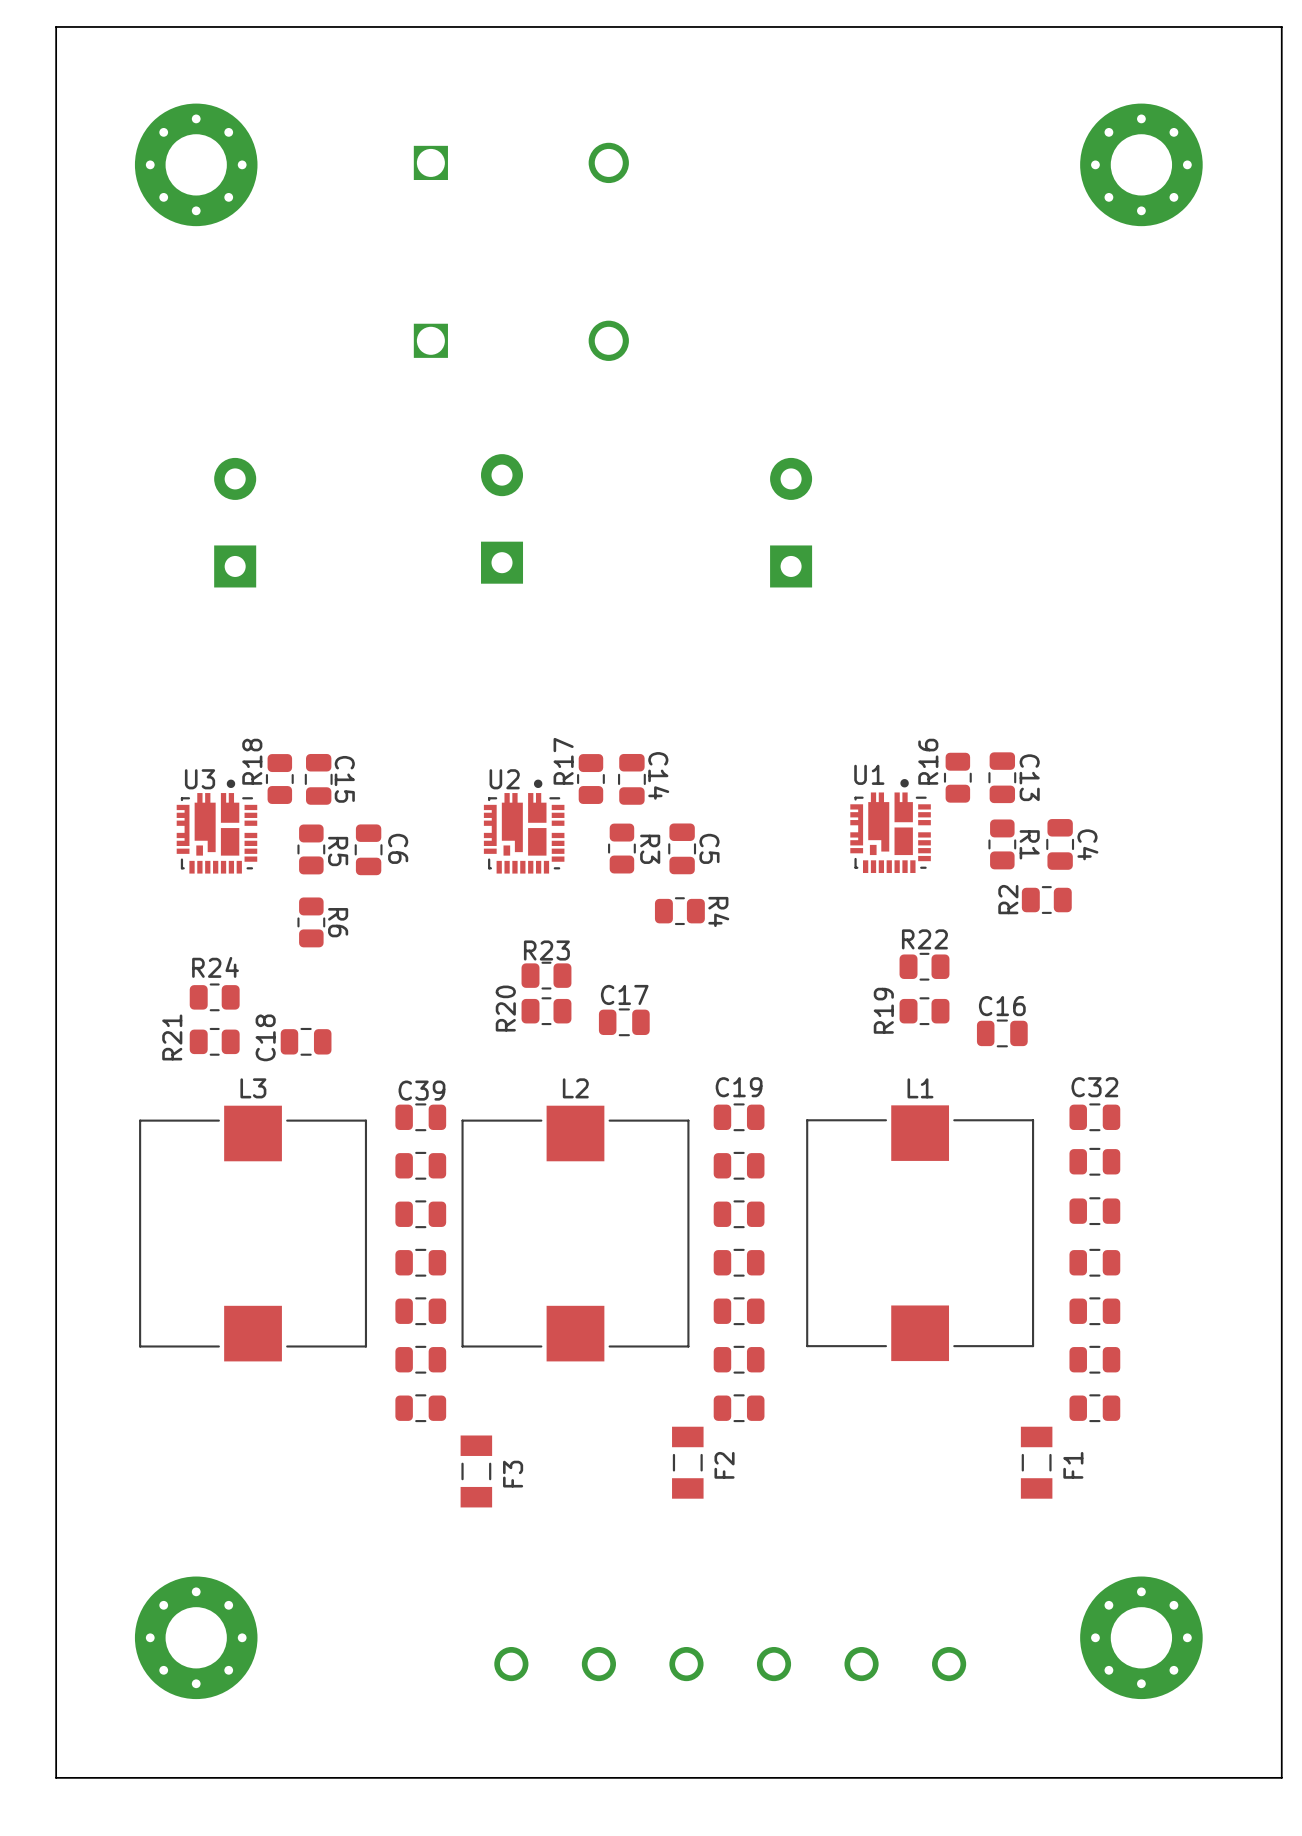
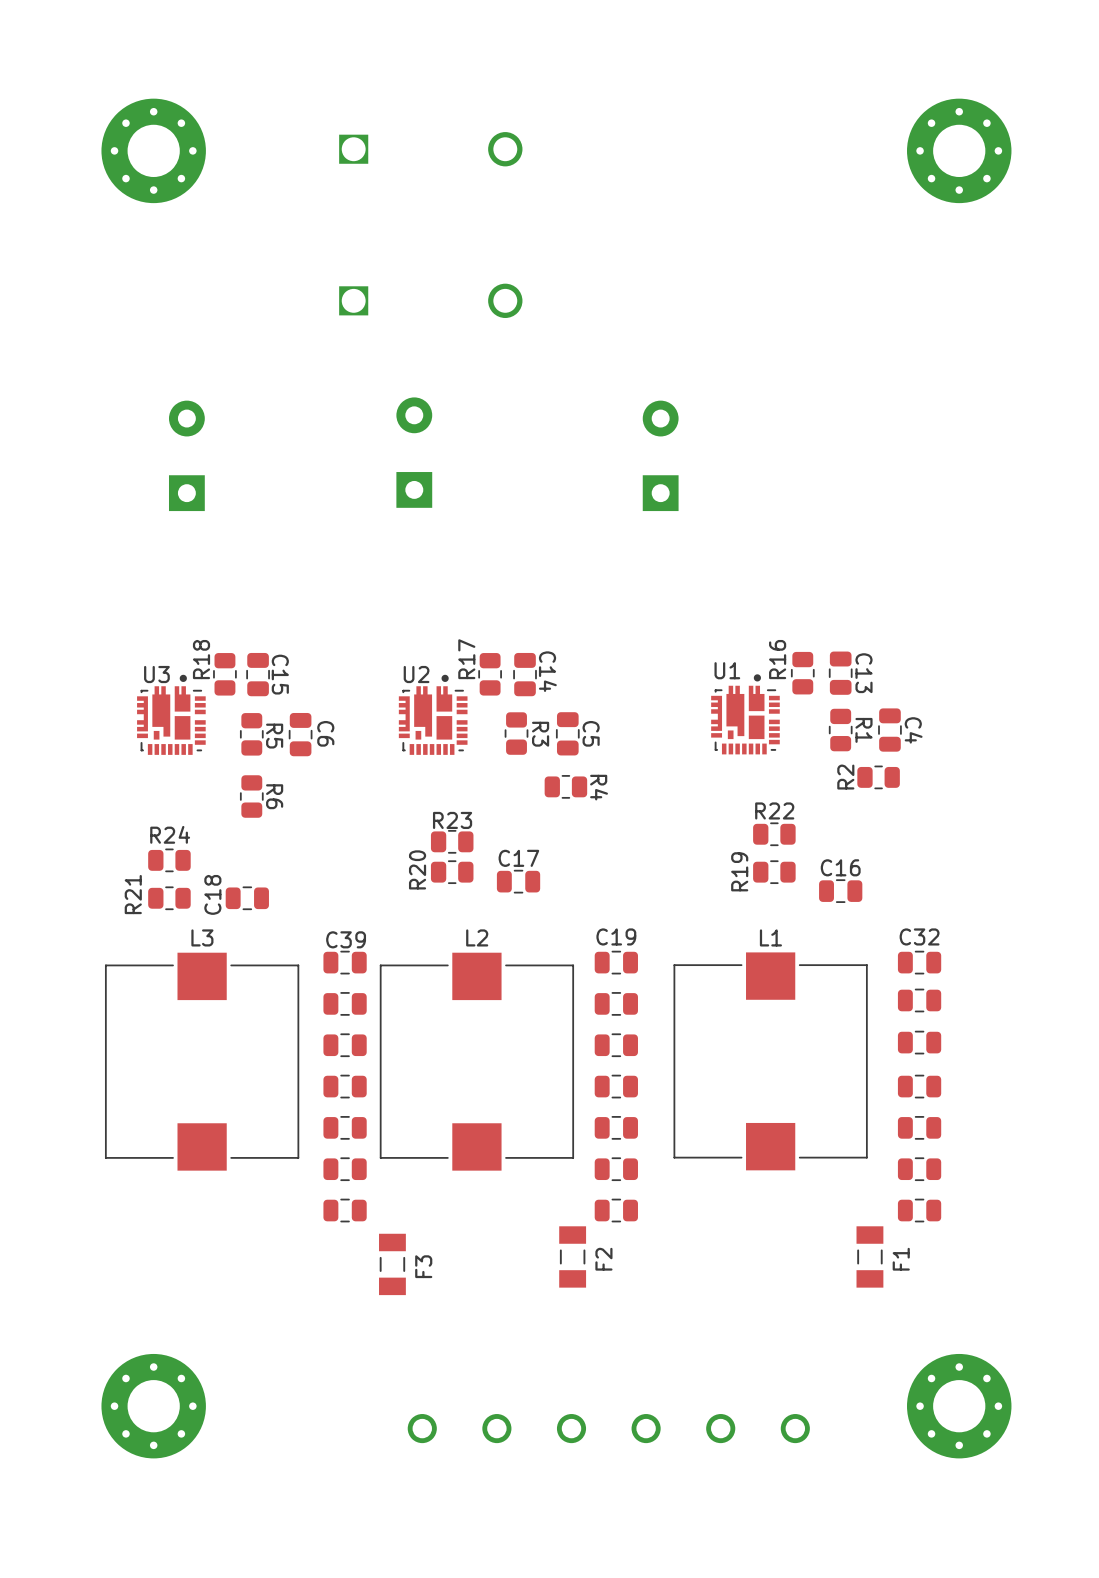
board edge: (56, 26) (1281, 26) (1281, 1777) (56, 1777) (56, 26) -> none

